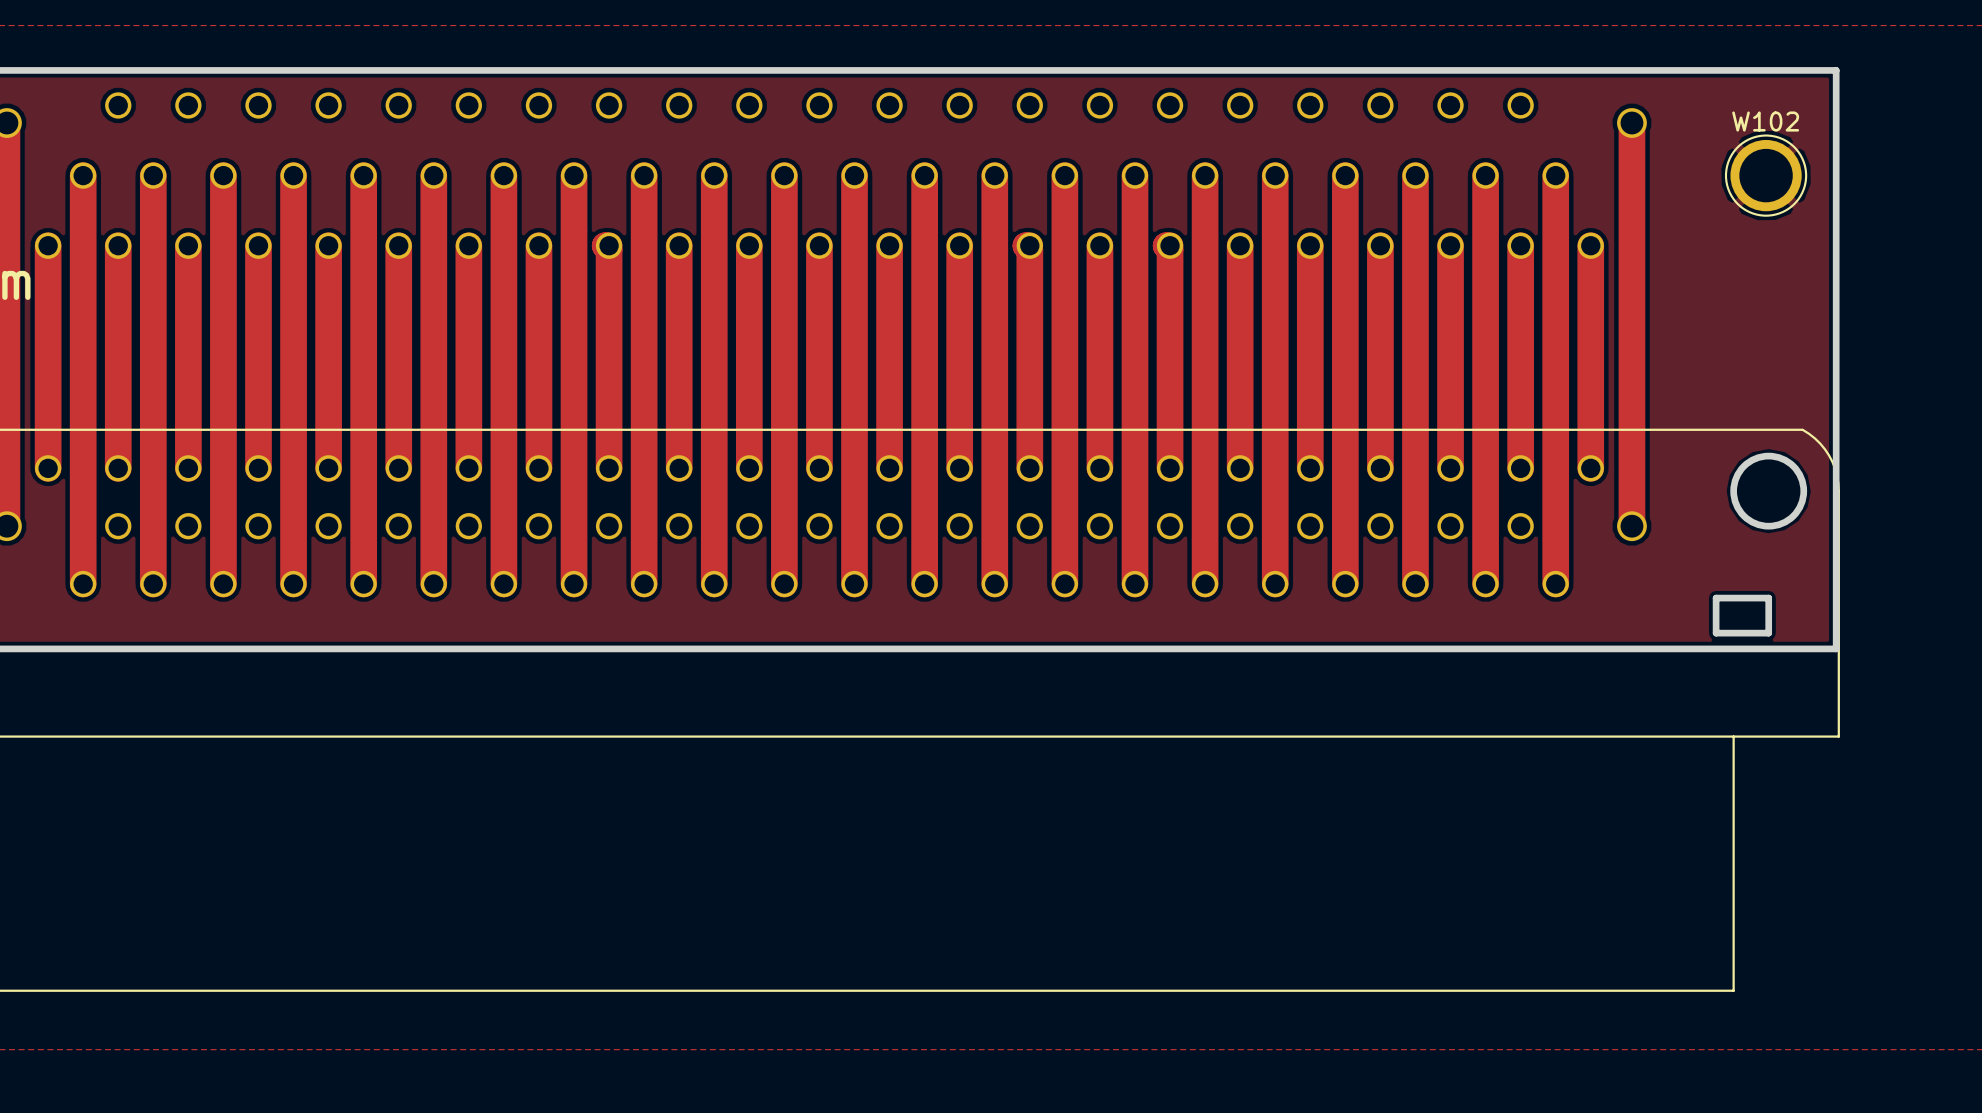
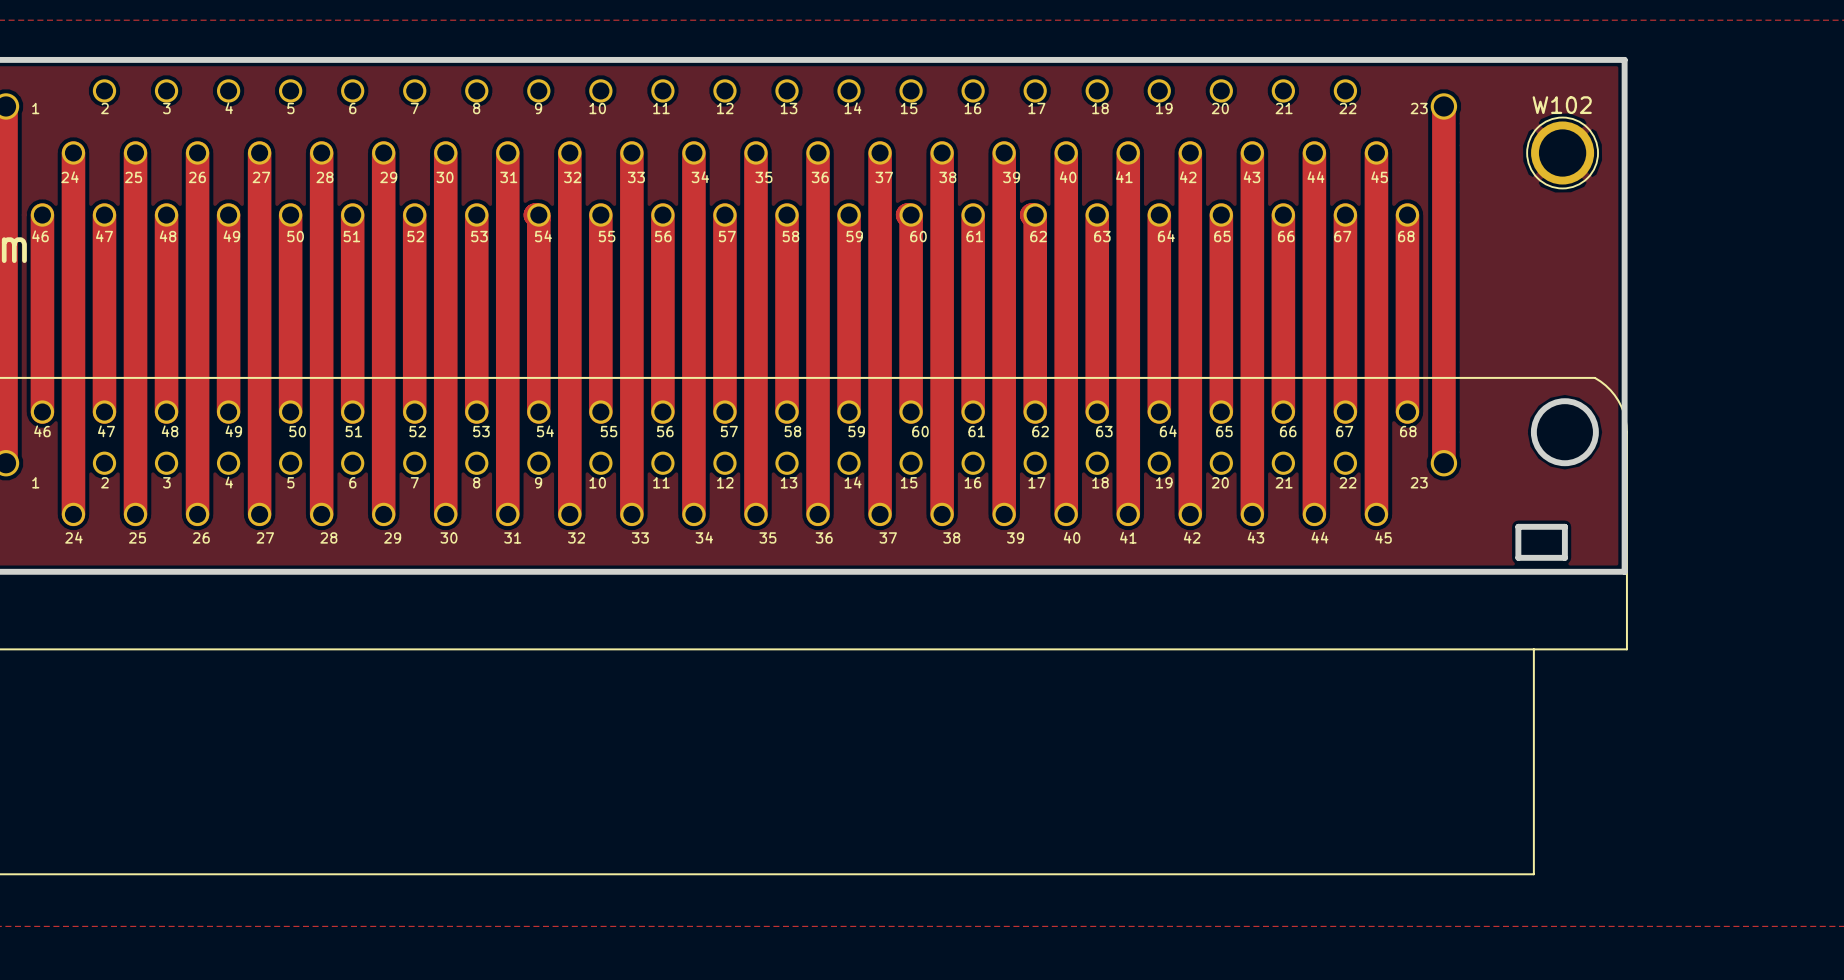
text: none -> 1 2 3 4 5 6 7 8 9 10 11 12 13 14 15 16 17 18 19 20 21 22 23 (729, 108)
text: none -> 24 25 26 27 28 29 30 31 32 33 34 35 36 37 38 39 40 41 42 43 44 45 (724, 177)
text: none -> 46 47 48 49 50 51 52 53 54 55 56 57 58 59 60 61 62 63 64 65 66 67 68 (723, 236)
text: none -> 46 47 48 49 50 51 52 53 54 55 56 57 58 59 60 61 62 63 64 65 66 67 68 (725, 431)
text: none -> 1 2 3 4 5 6 7 8 9 10 11 12 13 14 15 16 17 18 19 20 21 22 23 (729, 482)
text: none -> 24 25 26 27 28 29 30 31 32 33 34 35 36 37 38 39 40 41 42 43 44 45 (728, 537)

